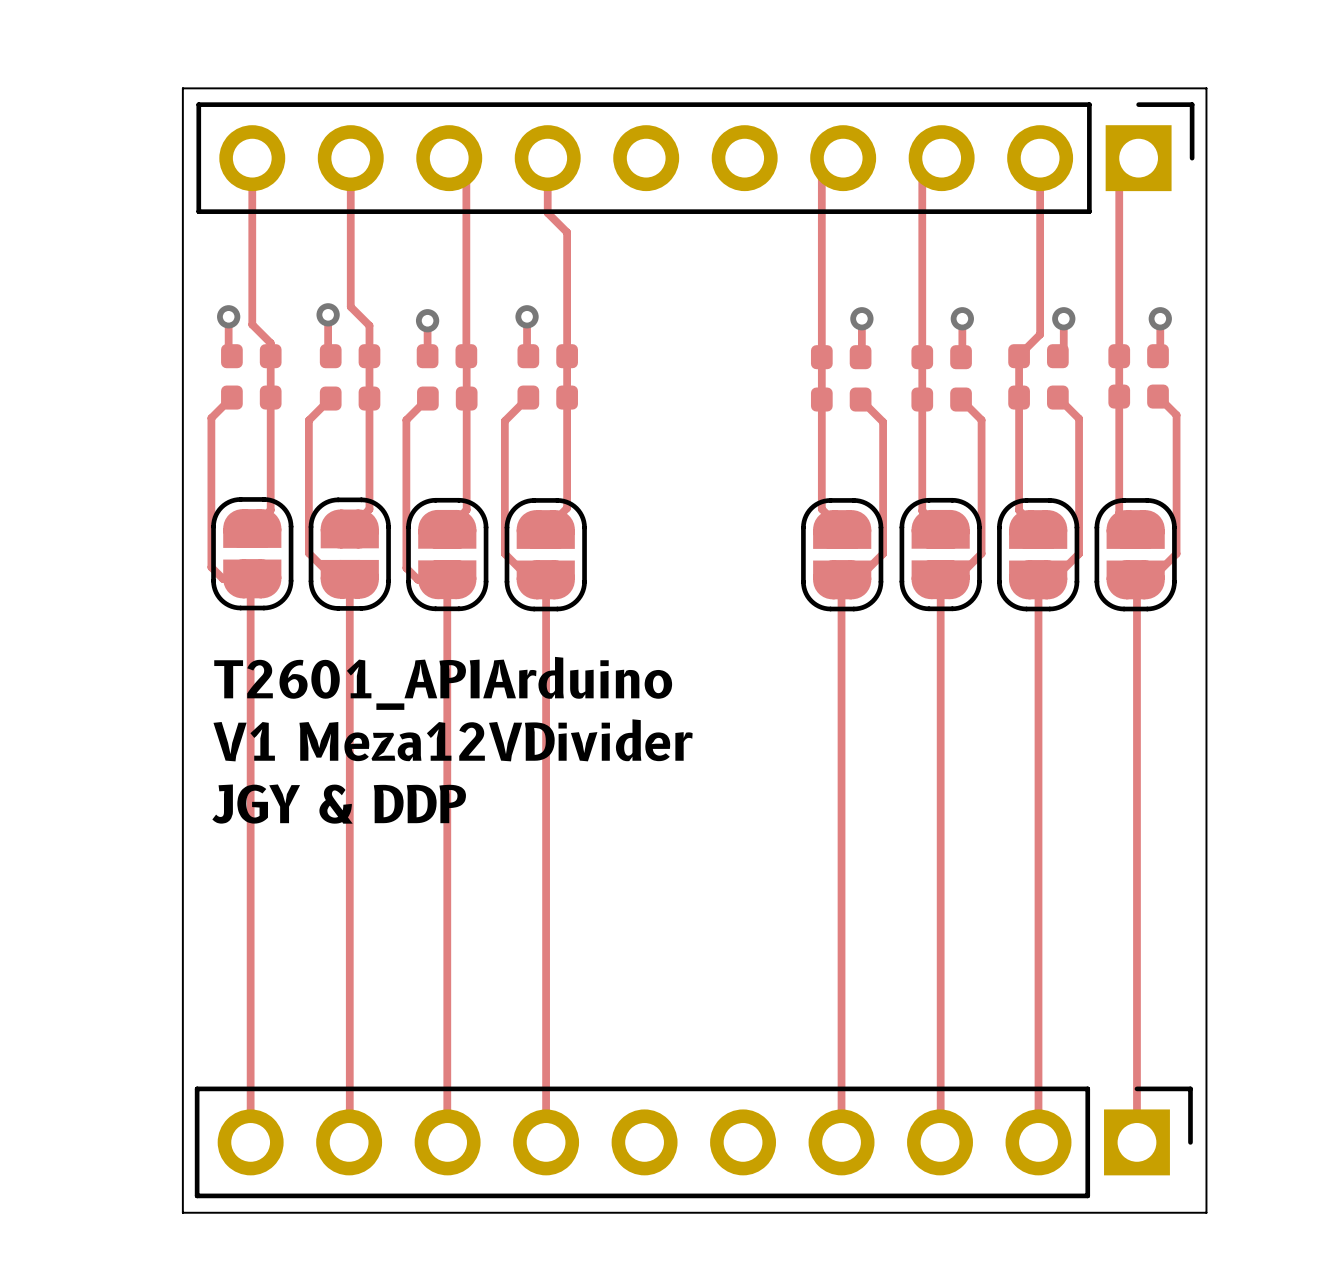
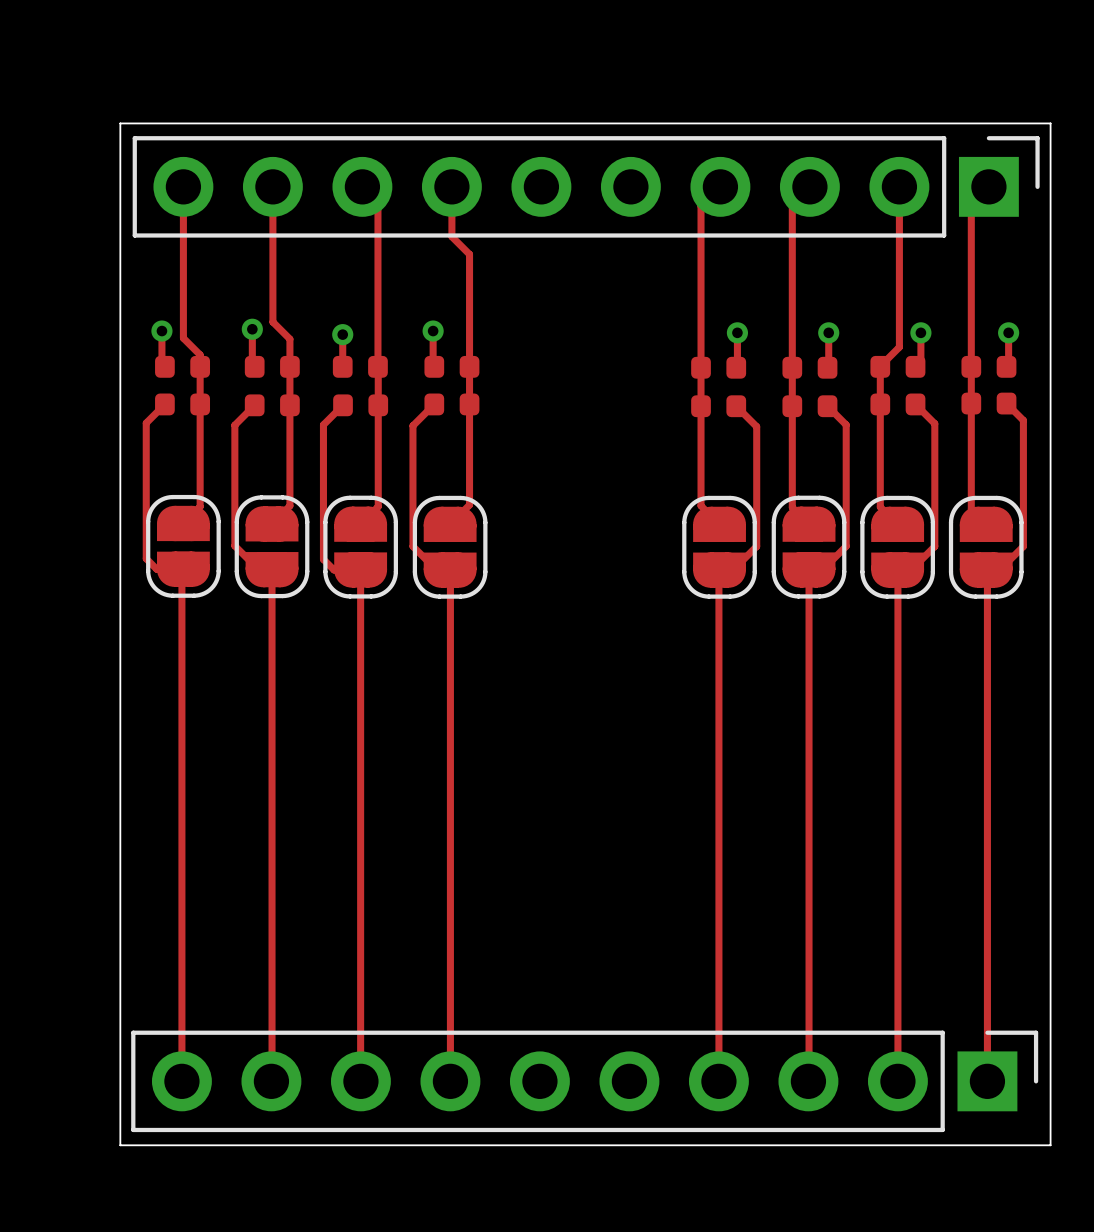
text: T2601_APIArduino (443, 683) -> none
text: V1 Meza12VDivider (453, 740) -> none
text: JGY & DDP (339, 804) -> none

